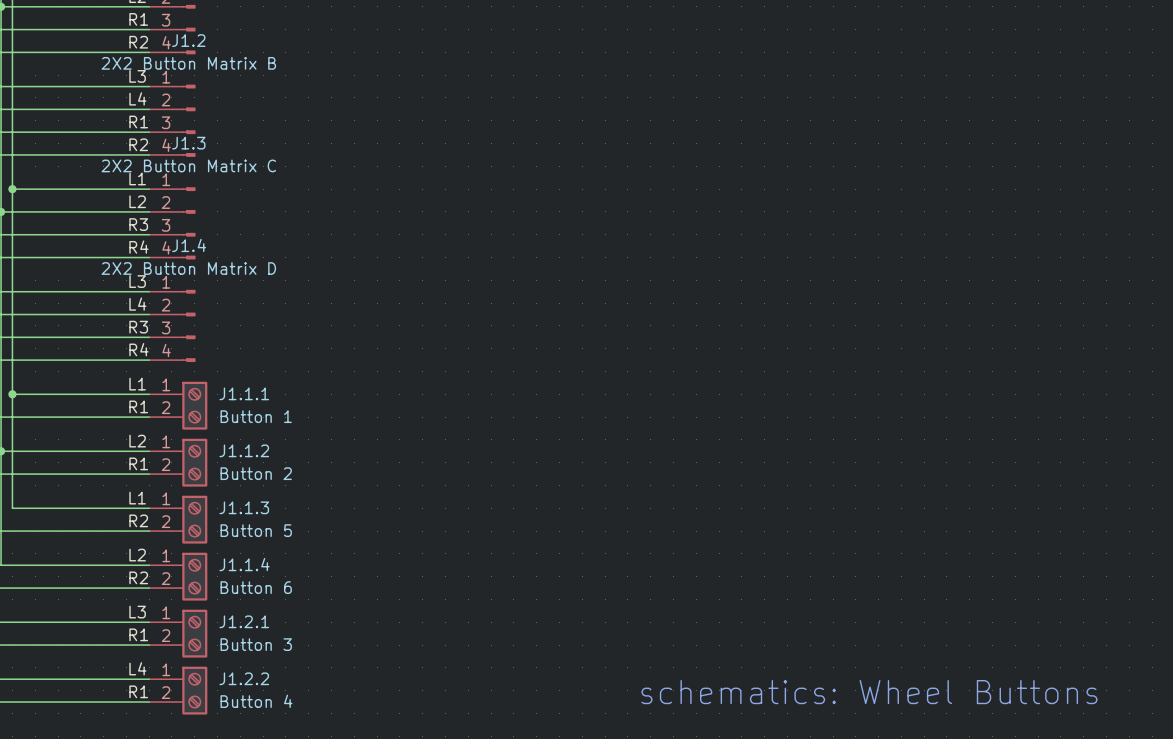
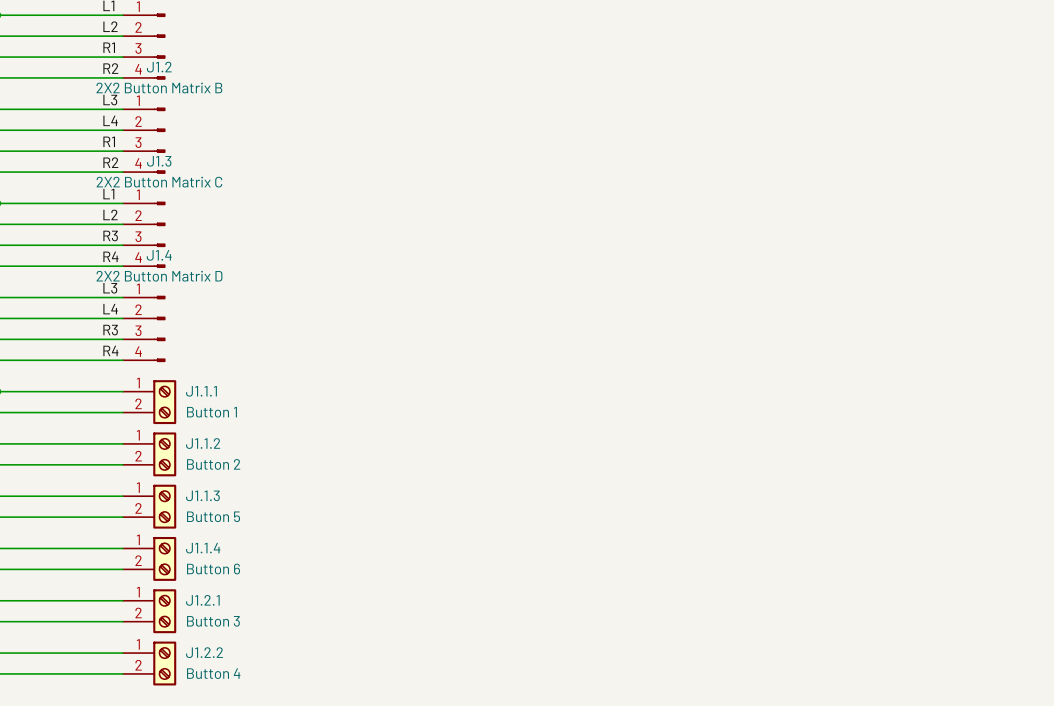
label: L1 (137, 384) -> none
label: R1 (138, 406) -> none
label: L2 (137, 441) -> none
label: R1 (138, 463) -> none
label: L1 (137, 498) -> none
label: R2 (138, 520) -> none
label: L2 (137, 555) -> none
label: R2 (138, 577) -> none
label: L3 (137, 612) -> none
label: R1 (138, 634) -> none
label: L4 (137, 668) -> none
label: R1 (138, 691) -> none
text: schematics: Wheel Buttons (869, 692) -> none

